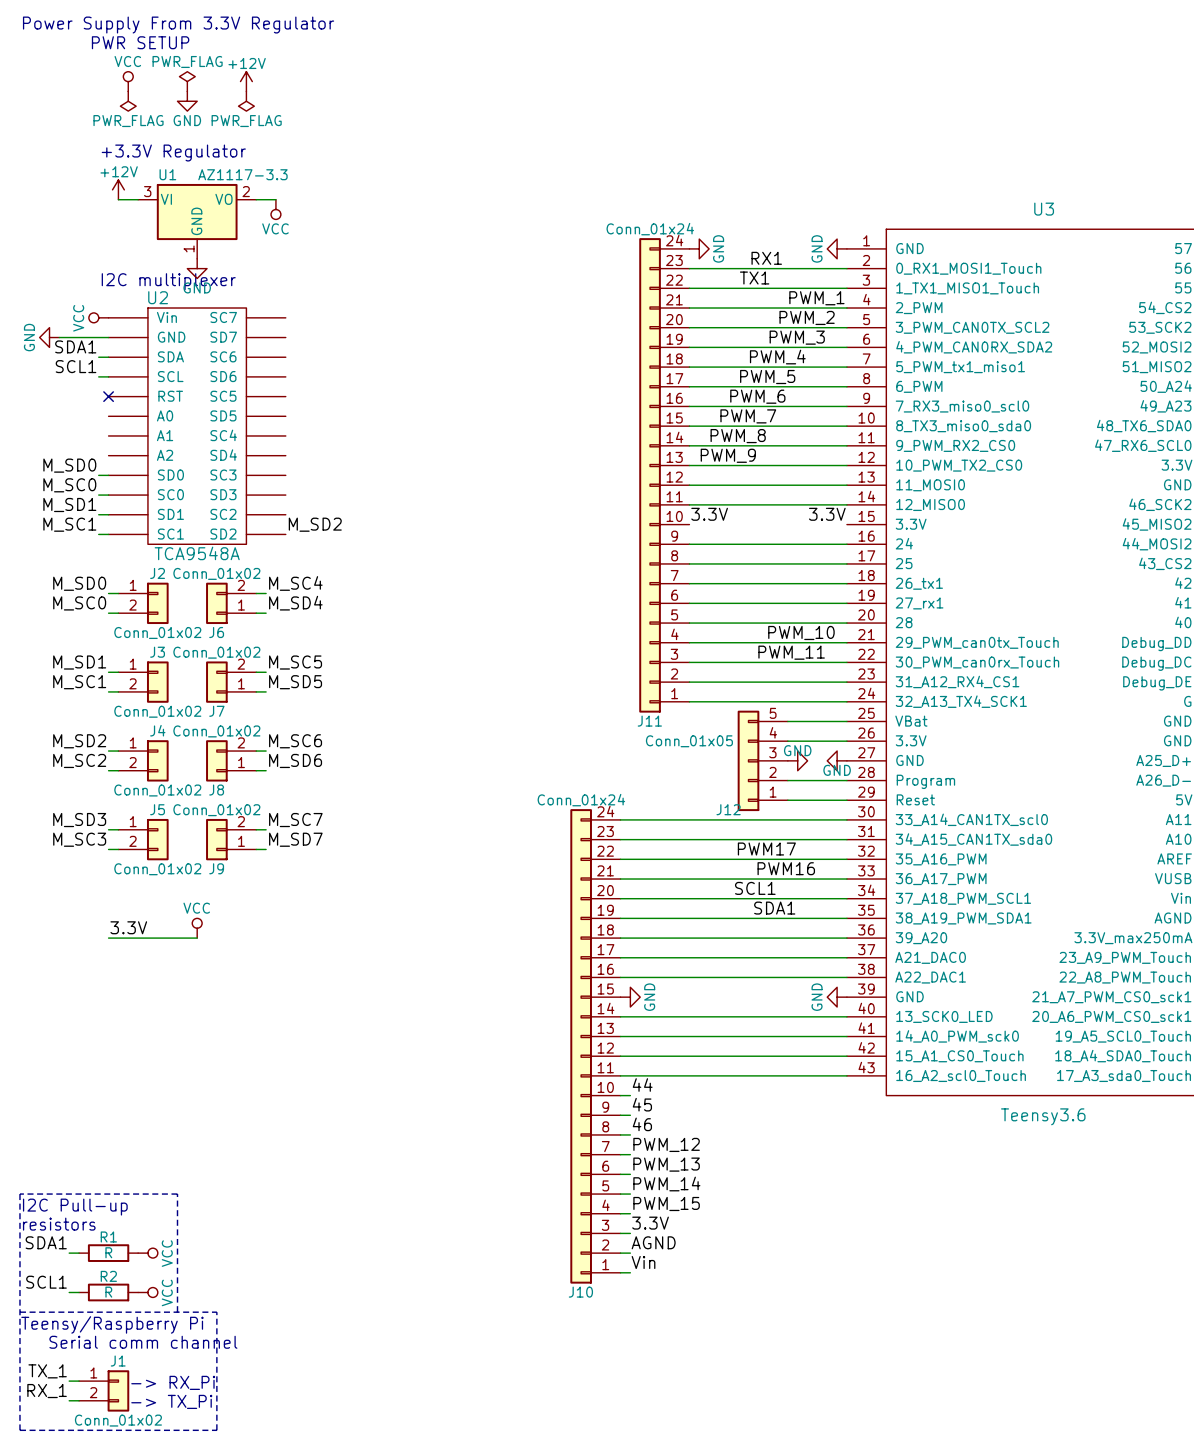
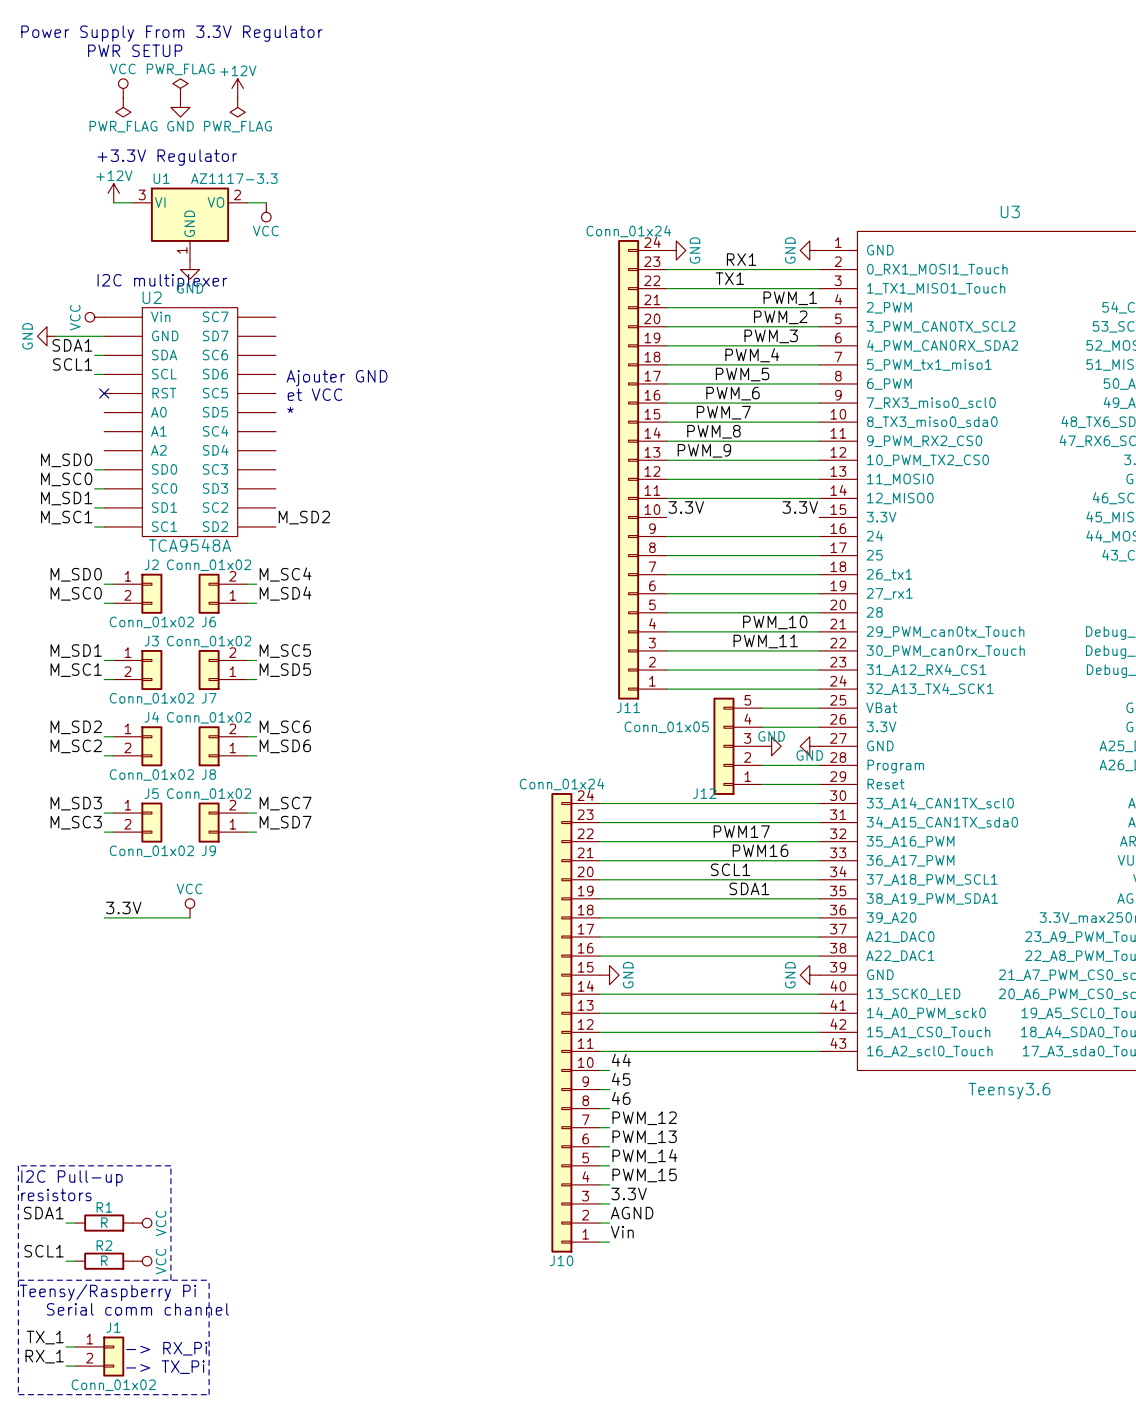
text: none -> Ajouter GND (337, 378)
text: none -> et VCC (314, 394)
text: none -> * (290, 409)

